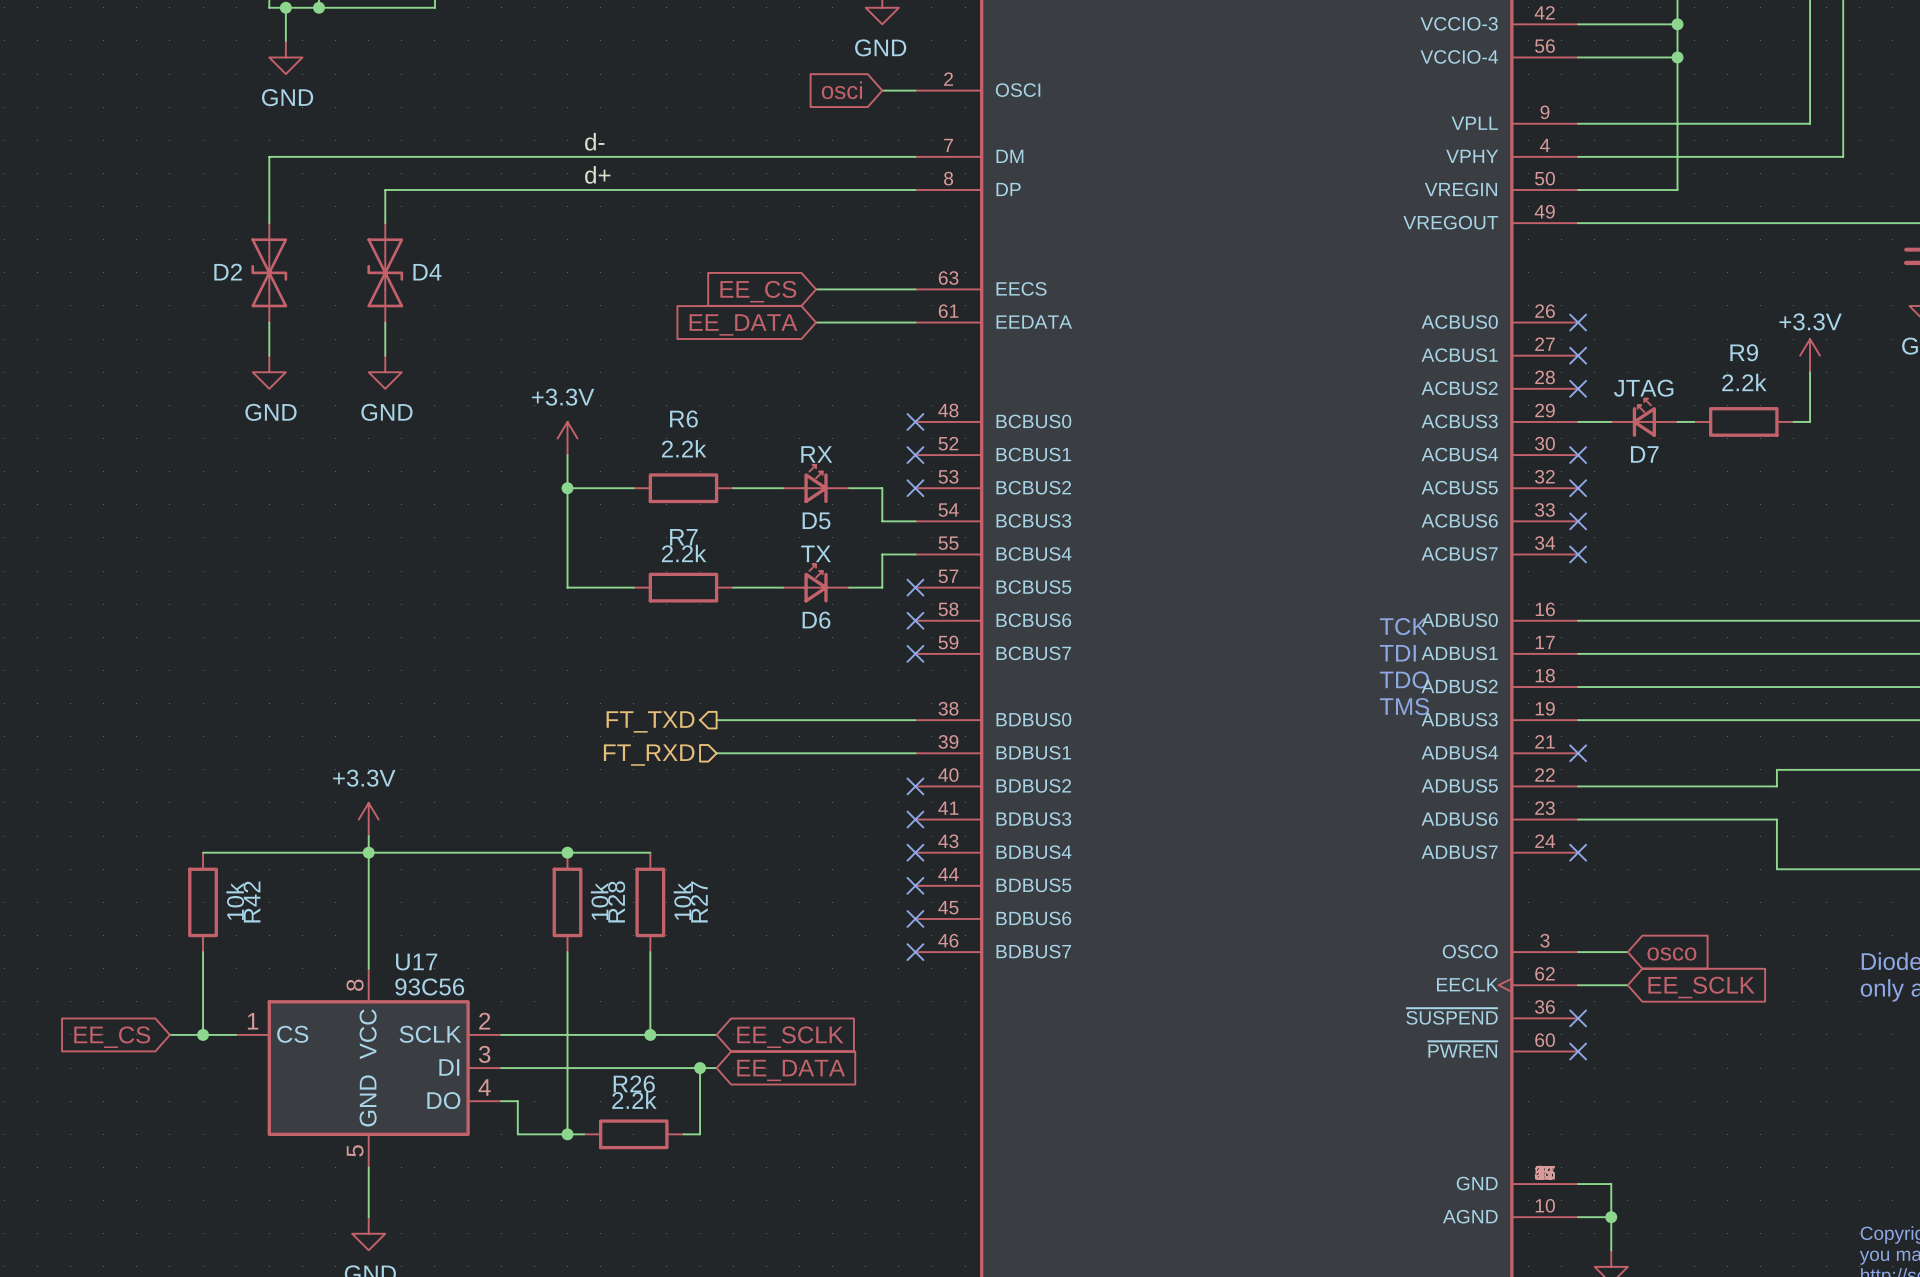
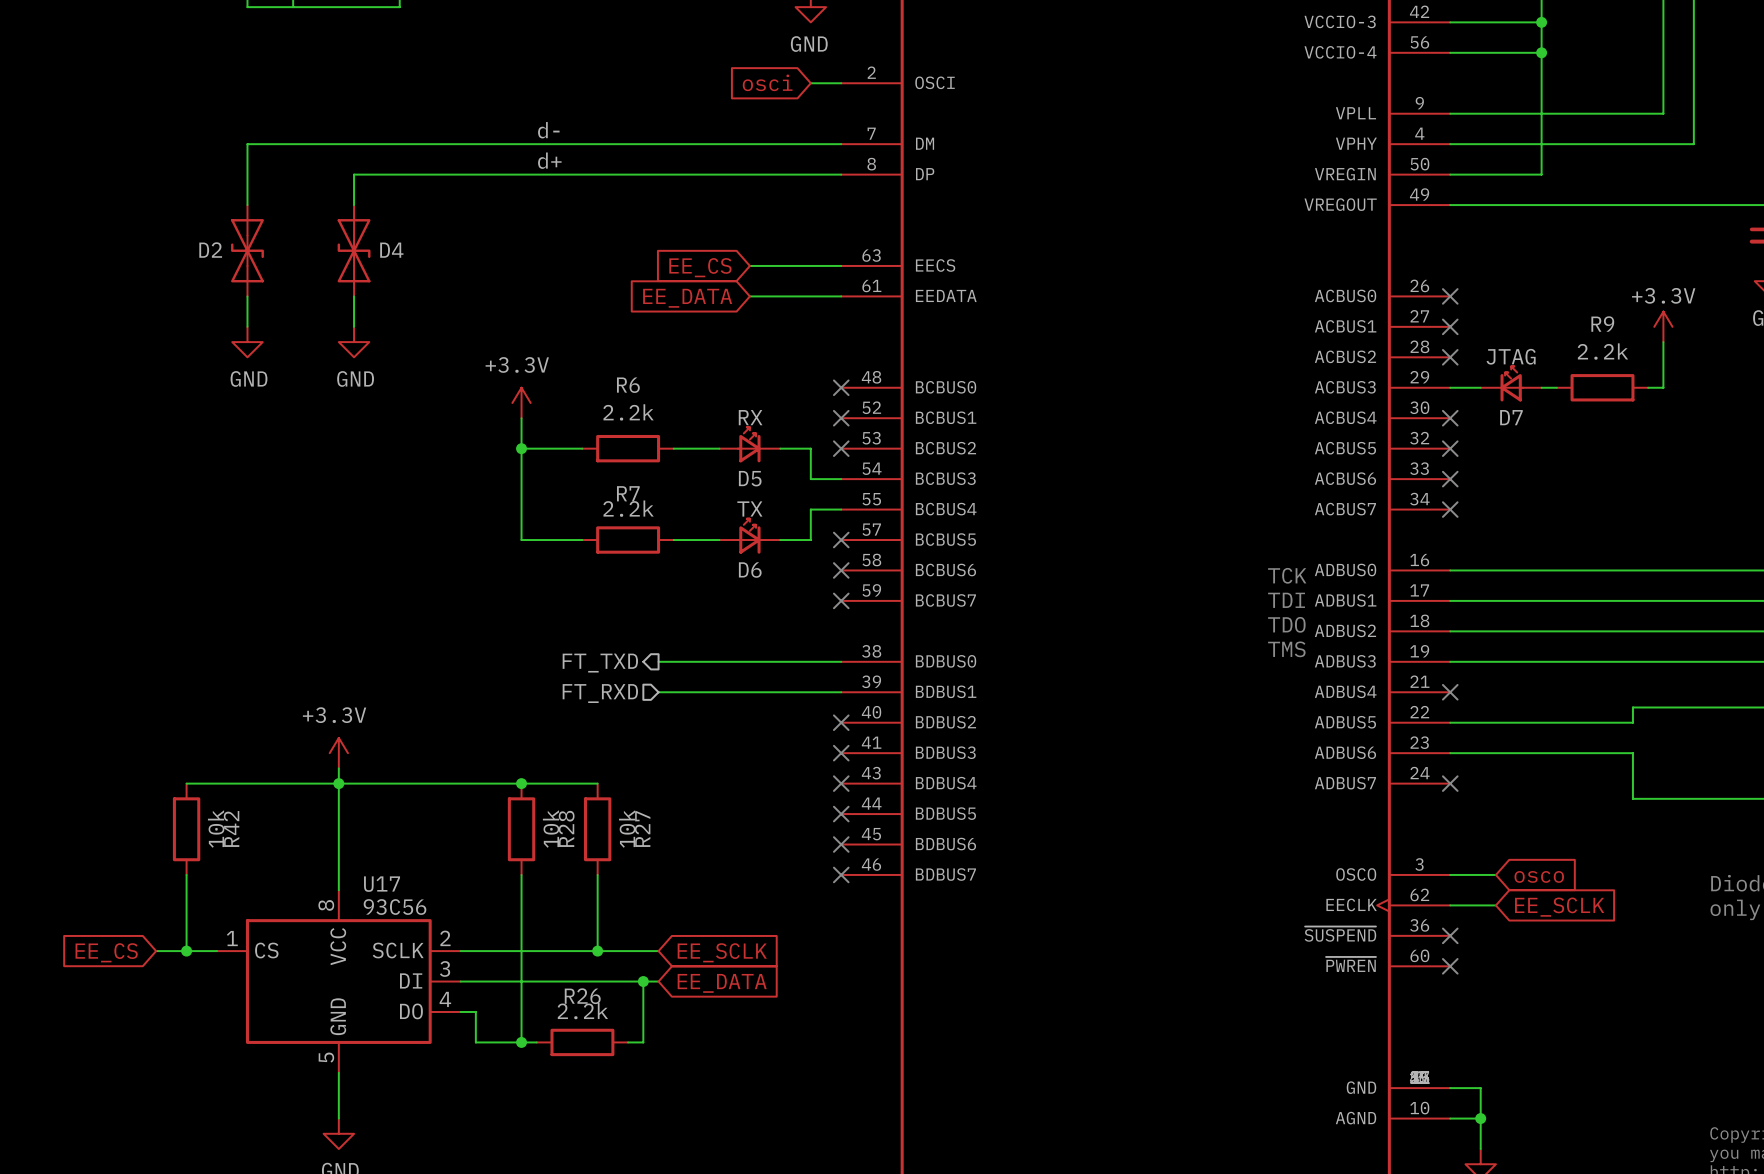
wire: (285, 7) (285, 40) -> none
junction: (285, 7) -> none
junction: (319, 7) -> none
power symbol: GND (285, 57) -> none

